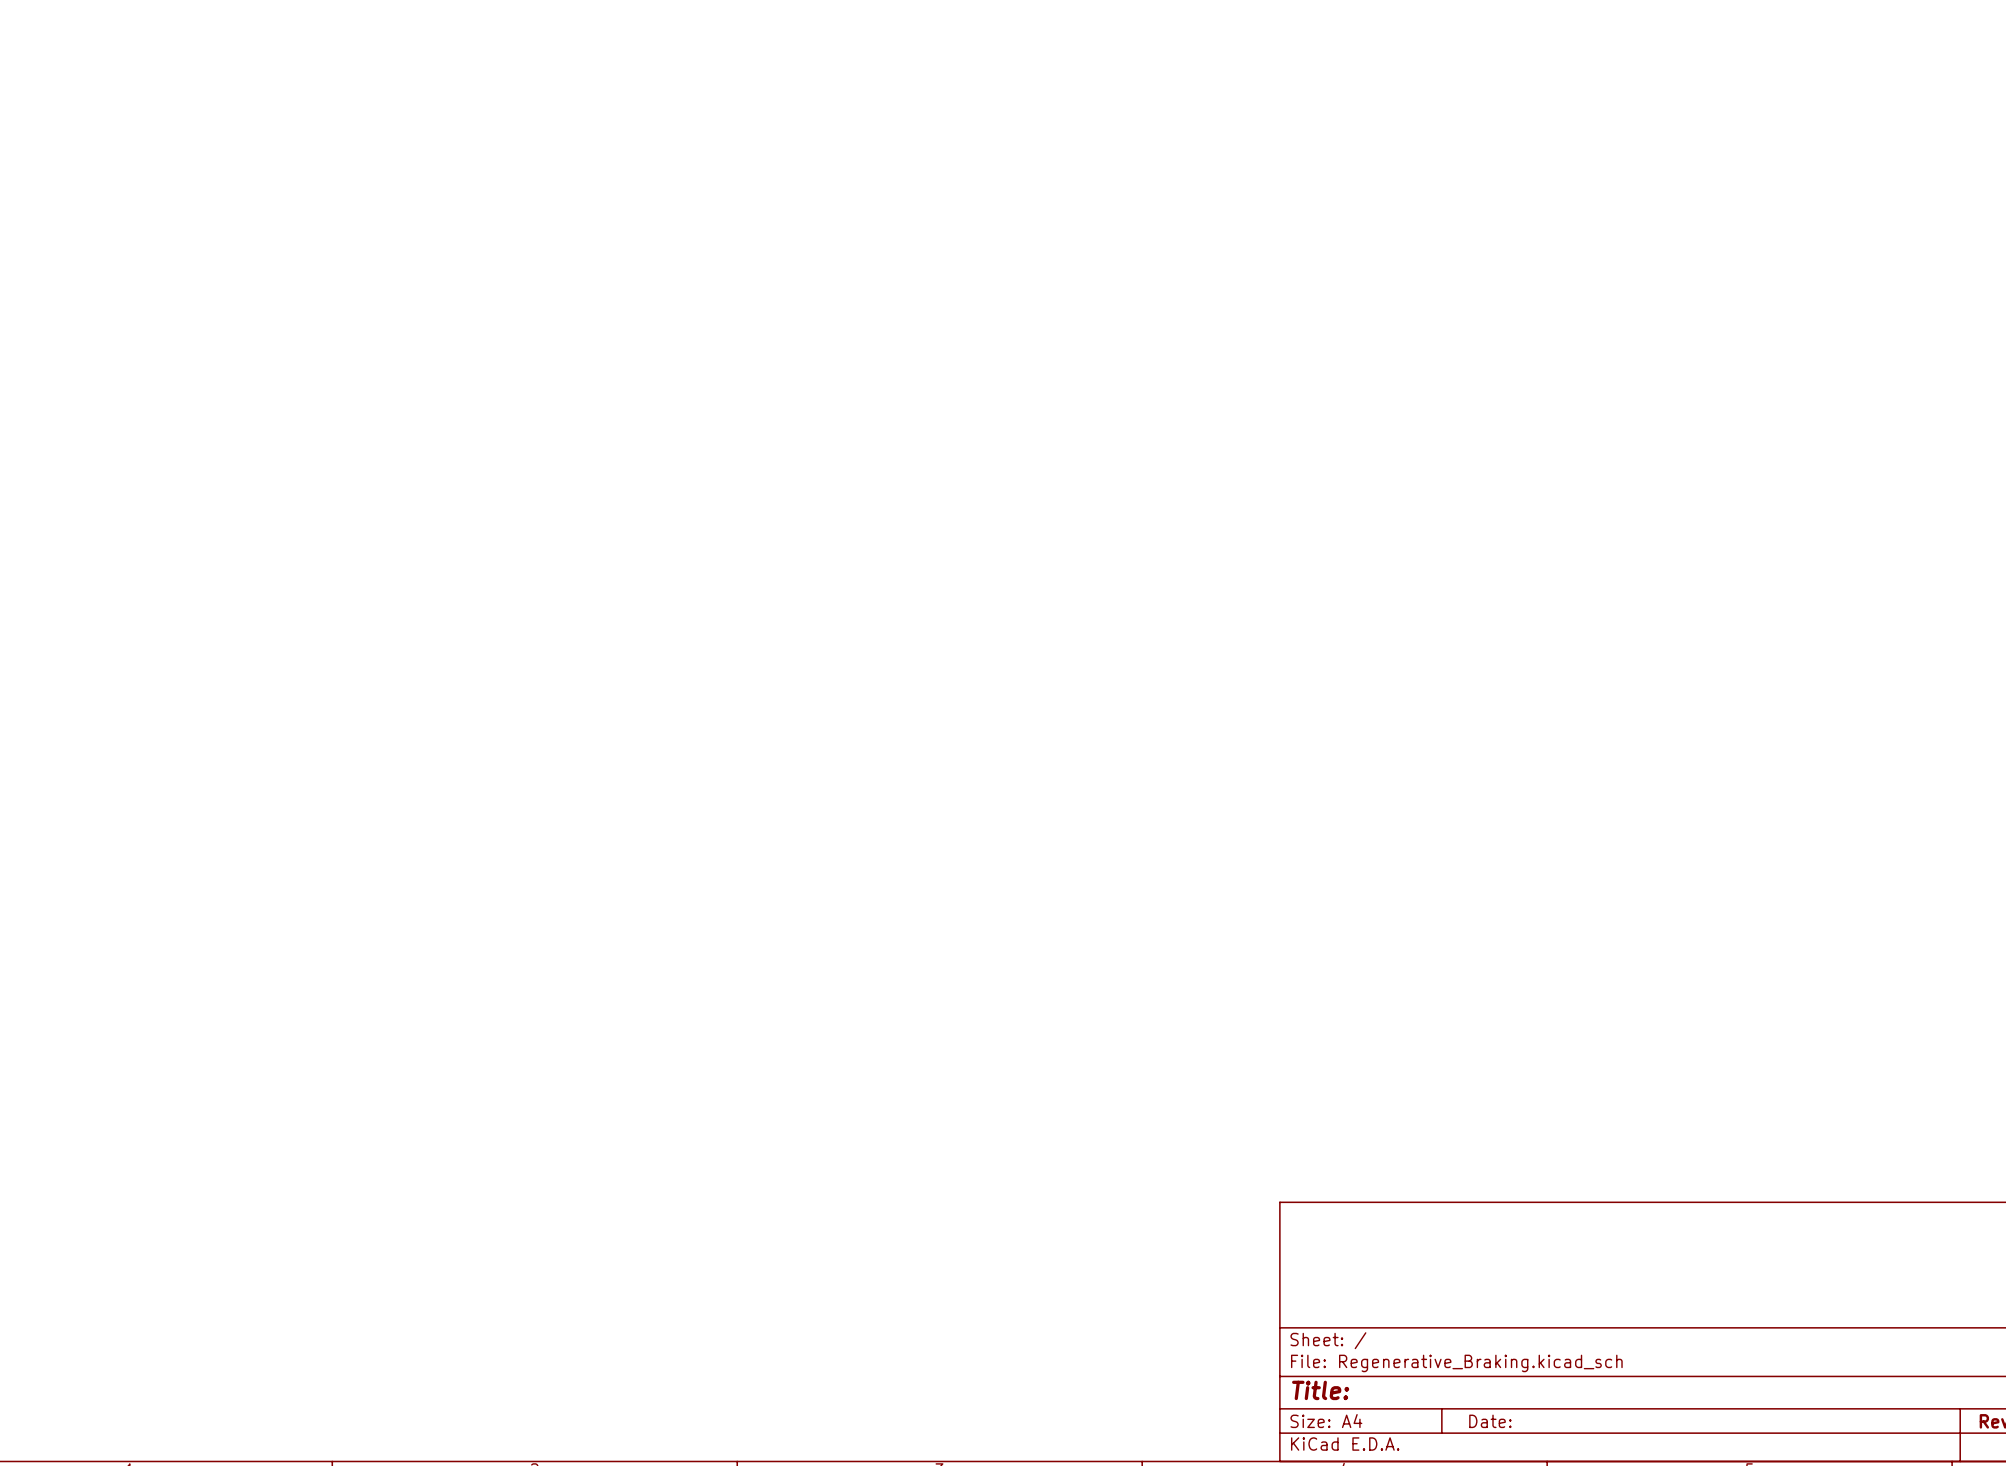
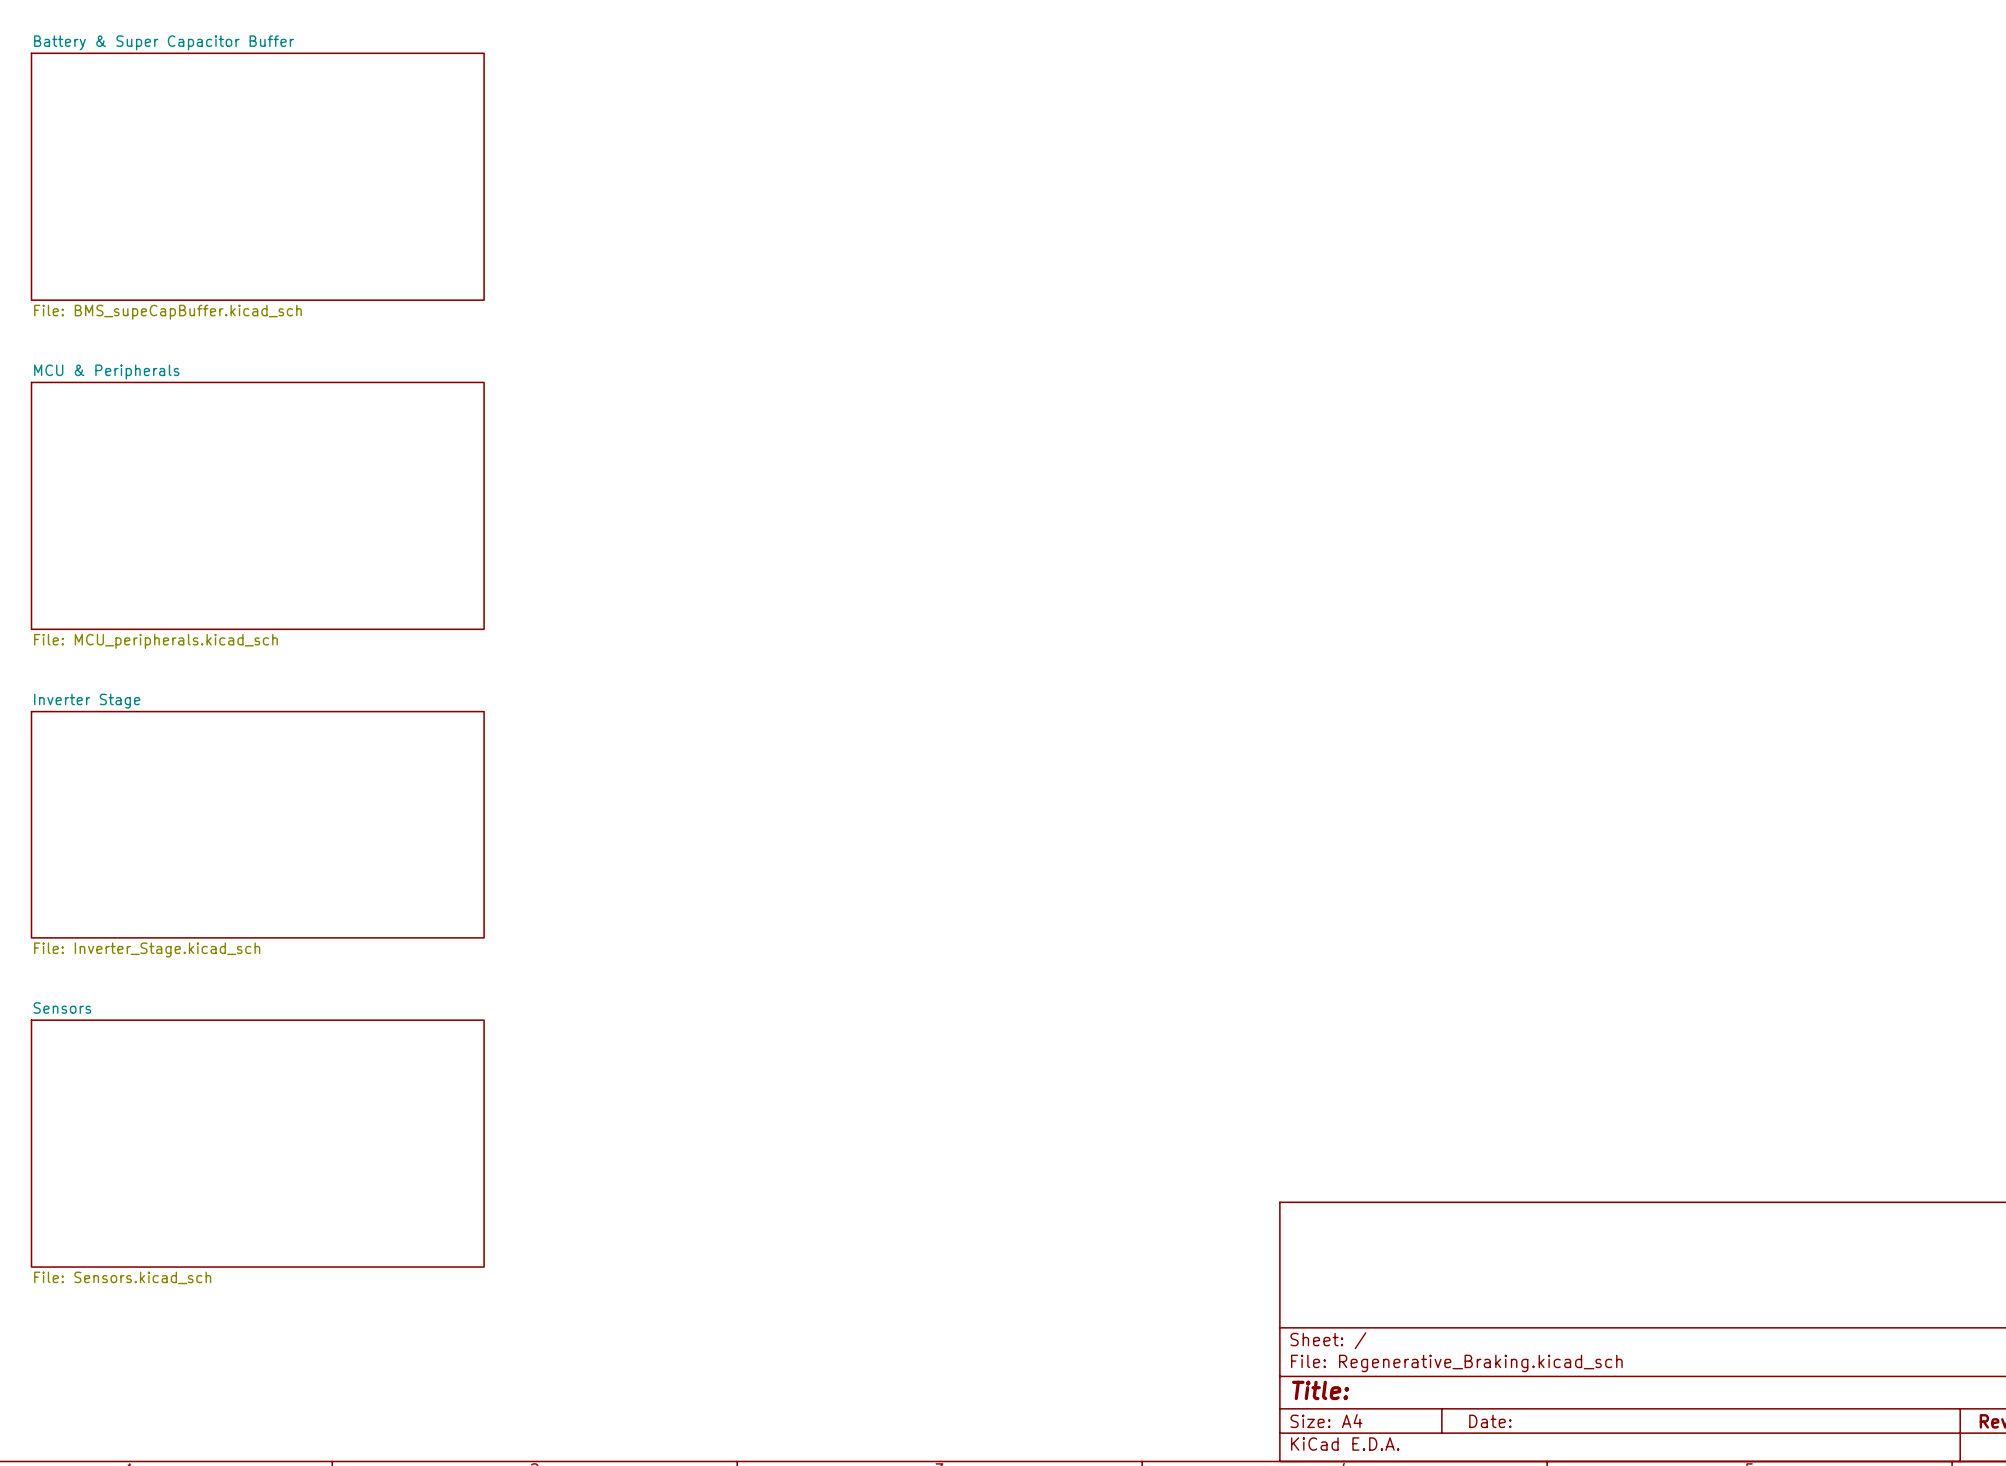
sheet Battery & Super Capacitor Buffer: none -> File: BMS_supeCapBuffer.kicad_sch (257, 176)
sheet MCU & Peripherals: none -> File: MCU_peripherals.kicad_sch (257, 505)
sheet Inverter Stage: none -> File: Inverter_Stage.kicad_sch (257, 824)
sheet Sensors: none -> File: Sensors.kicad_sch (257, 1143)

